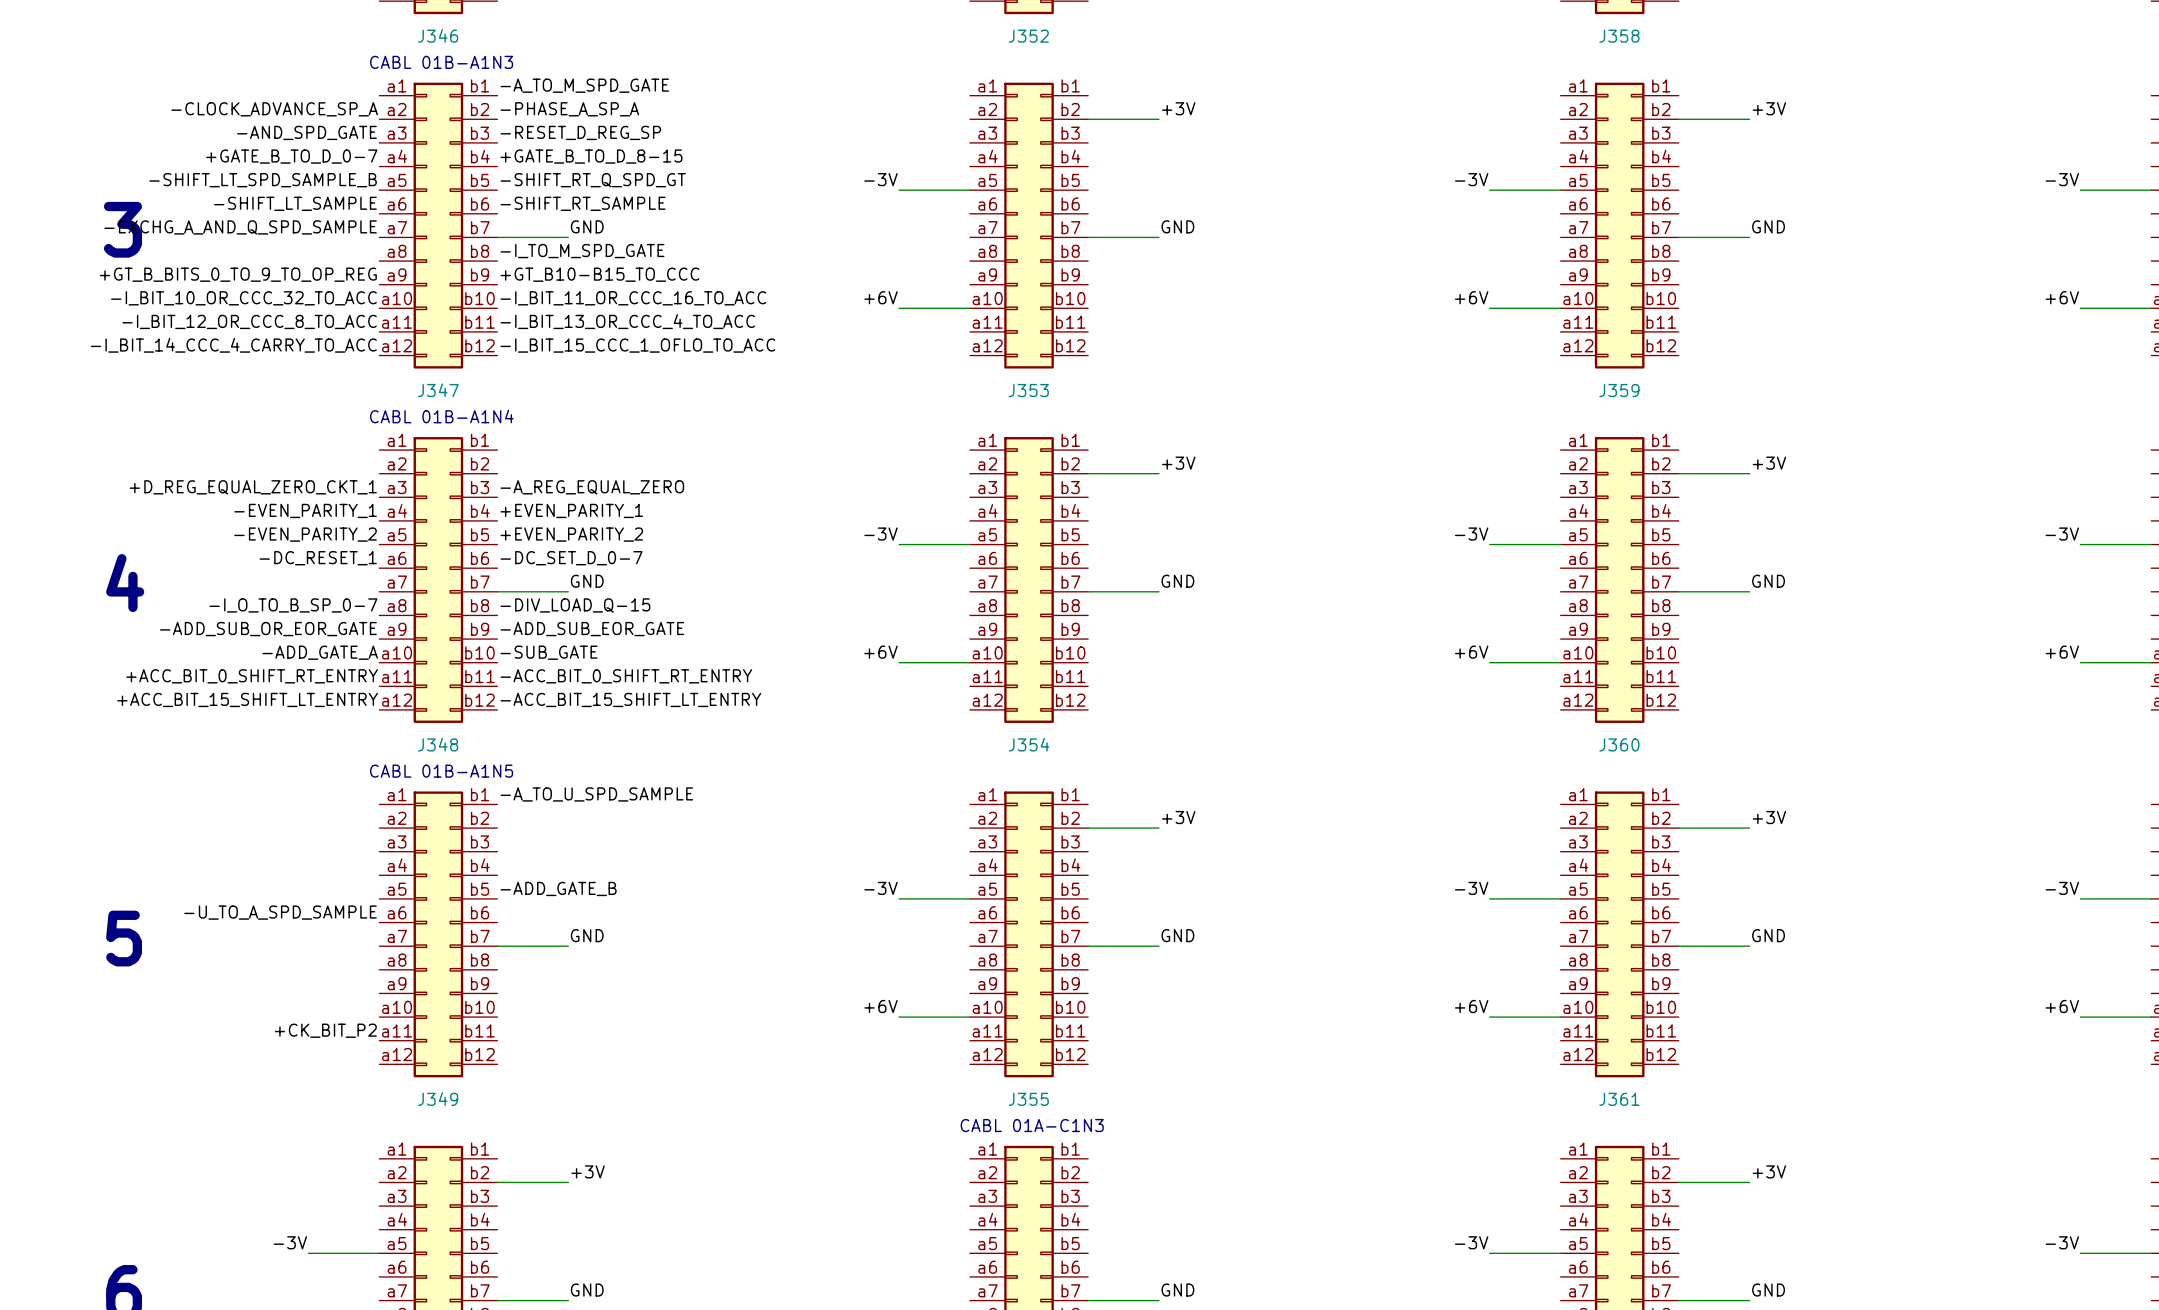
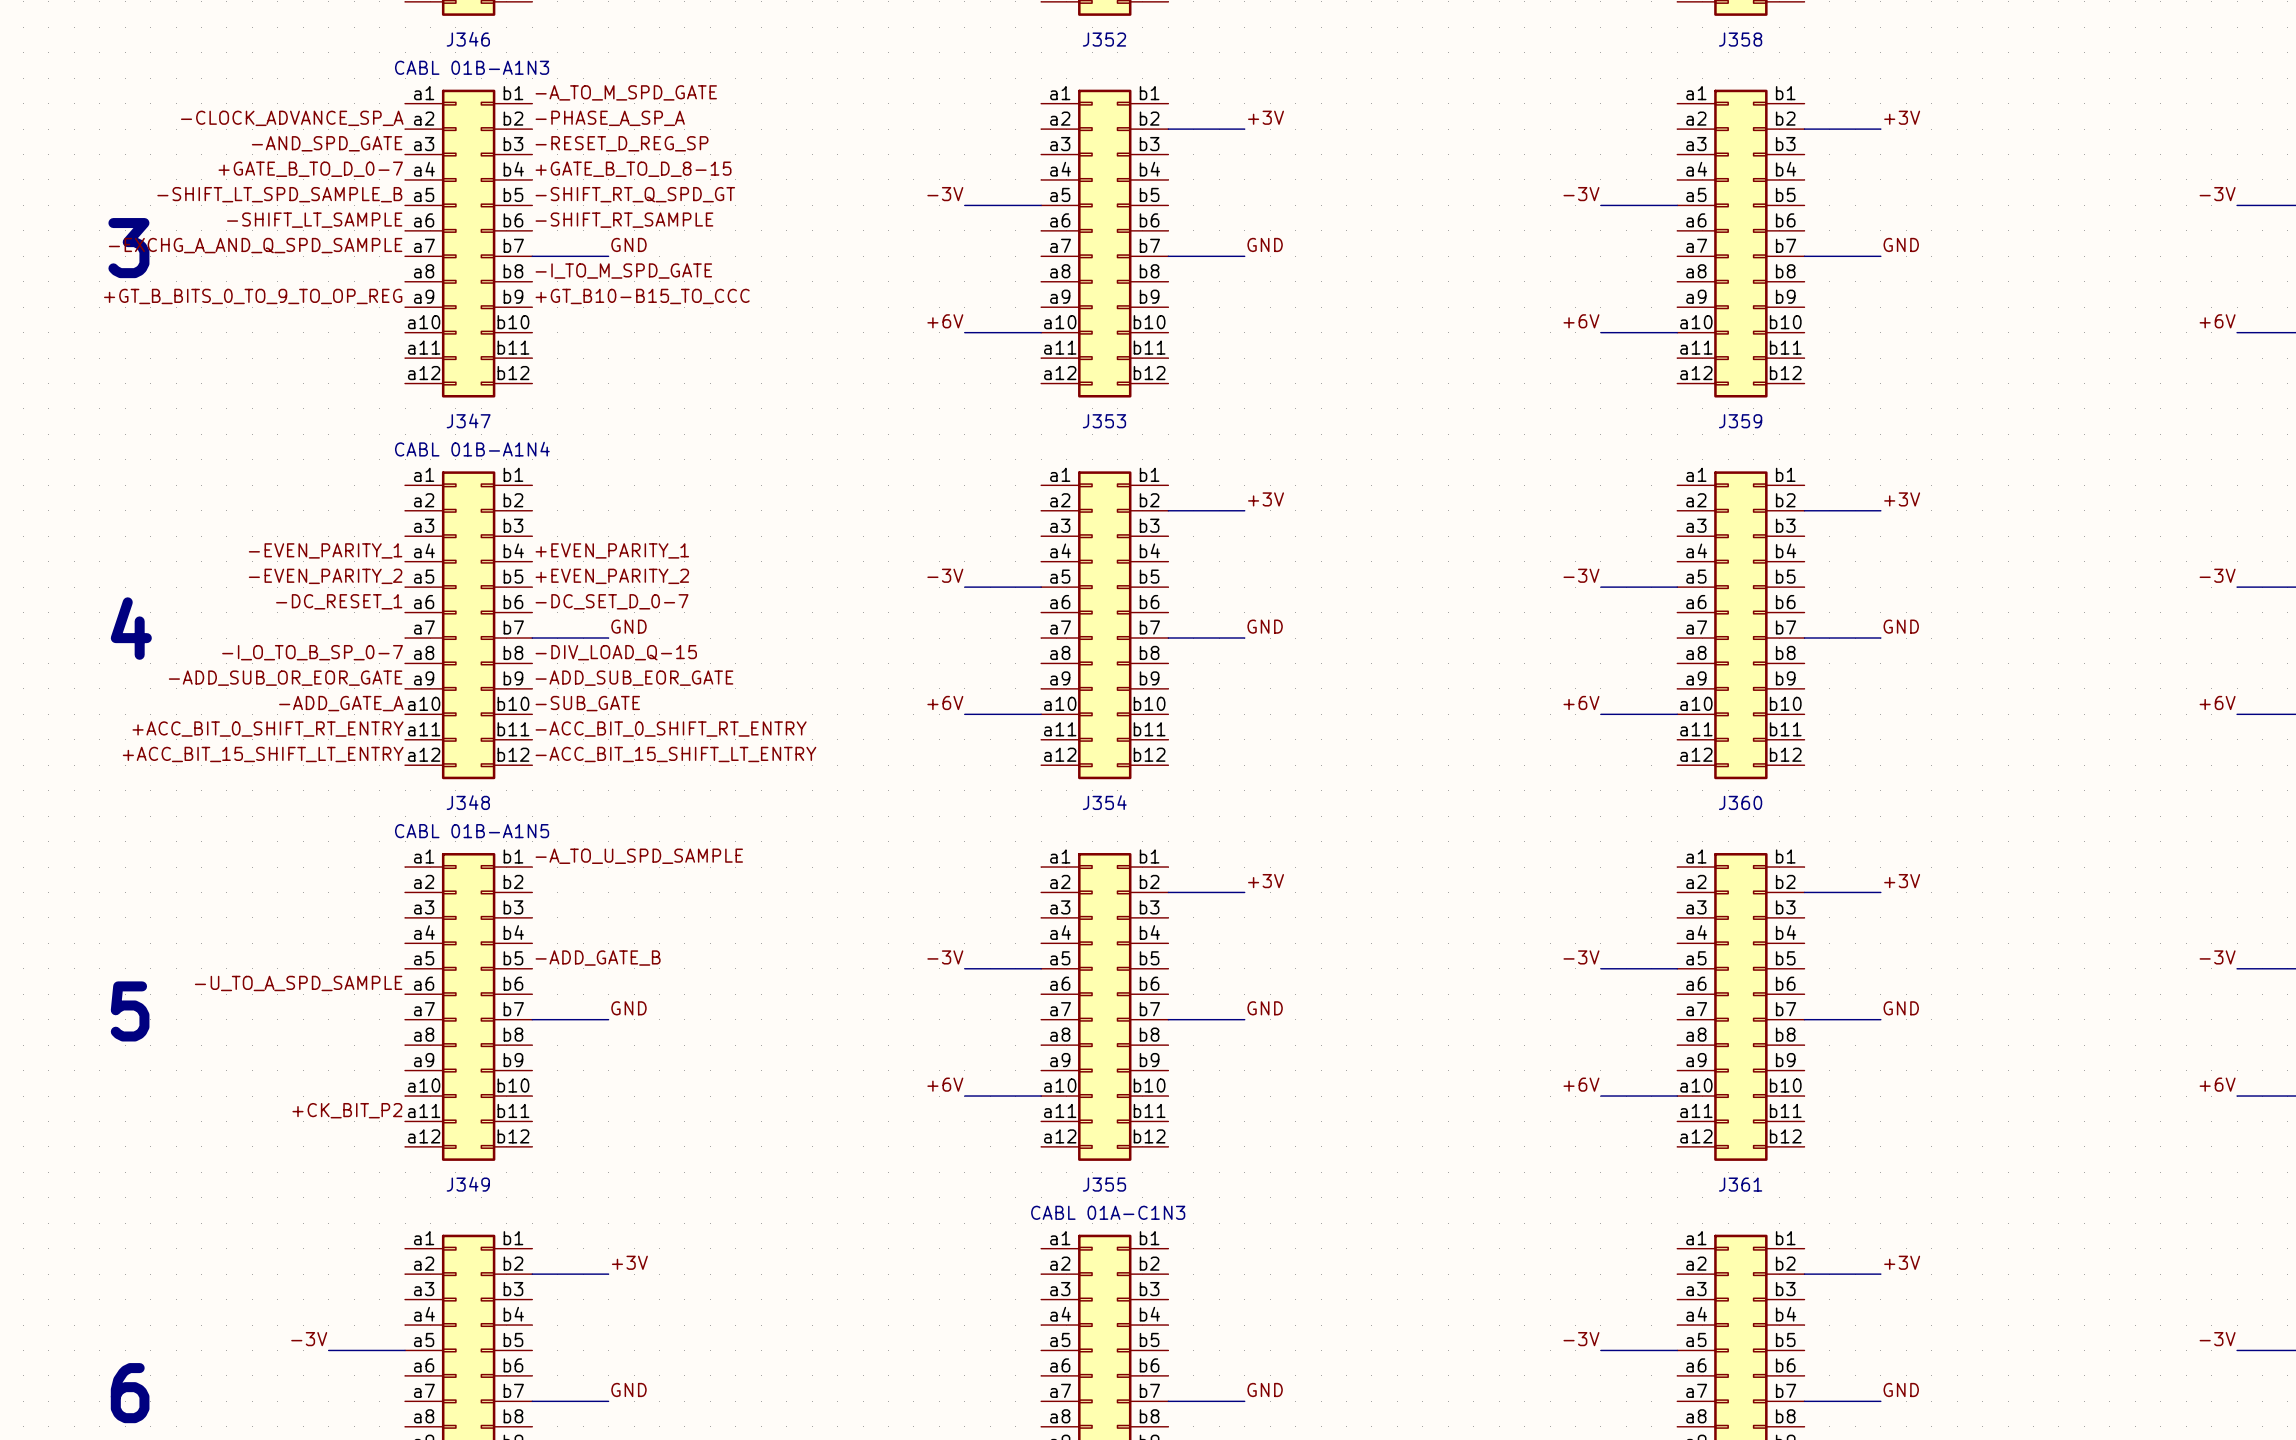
label: -I_BIT_10_OR_CCC_32_TO_ACC (243, 298) -> none
label: -I_BIT_11_OR_CCC_16_TO_ACC (633, 298) -> none
label: -I_BIT_12_OR_CCC_8_TO_ACC (249, 321) -> none
label: -I_BIT_13_OR_CCC_4_TO_ACC (627, 321) -> none
label: -I_BIT_14_CCC_4_CARRY_TO_ACC (233, 345) -> none
label: -I_BIT_15_CCC_1_OFLO_TO_ACC (637, 345) -> none
label: +D_REG_EQUAL_ZERO_CKT_1 (253, 487) -> none
label: -A_REG_EQUAL_ZERO (592, 487) -> none

